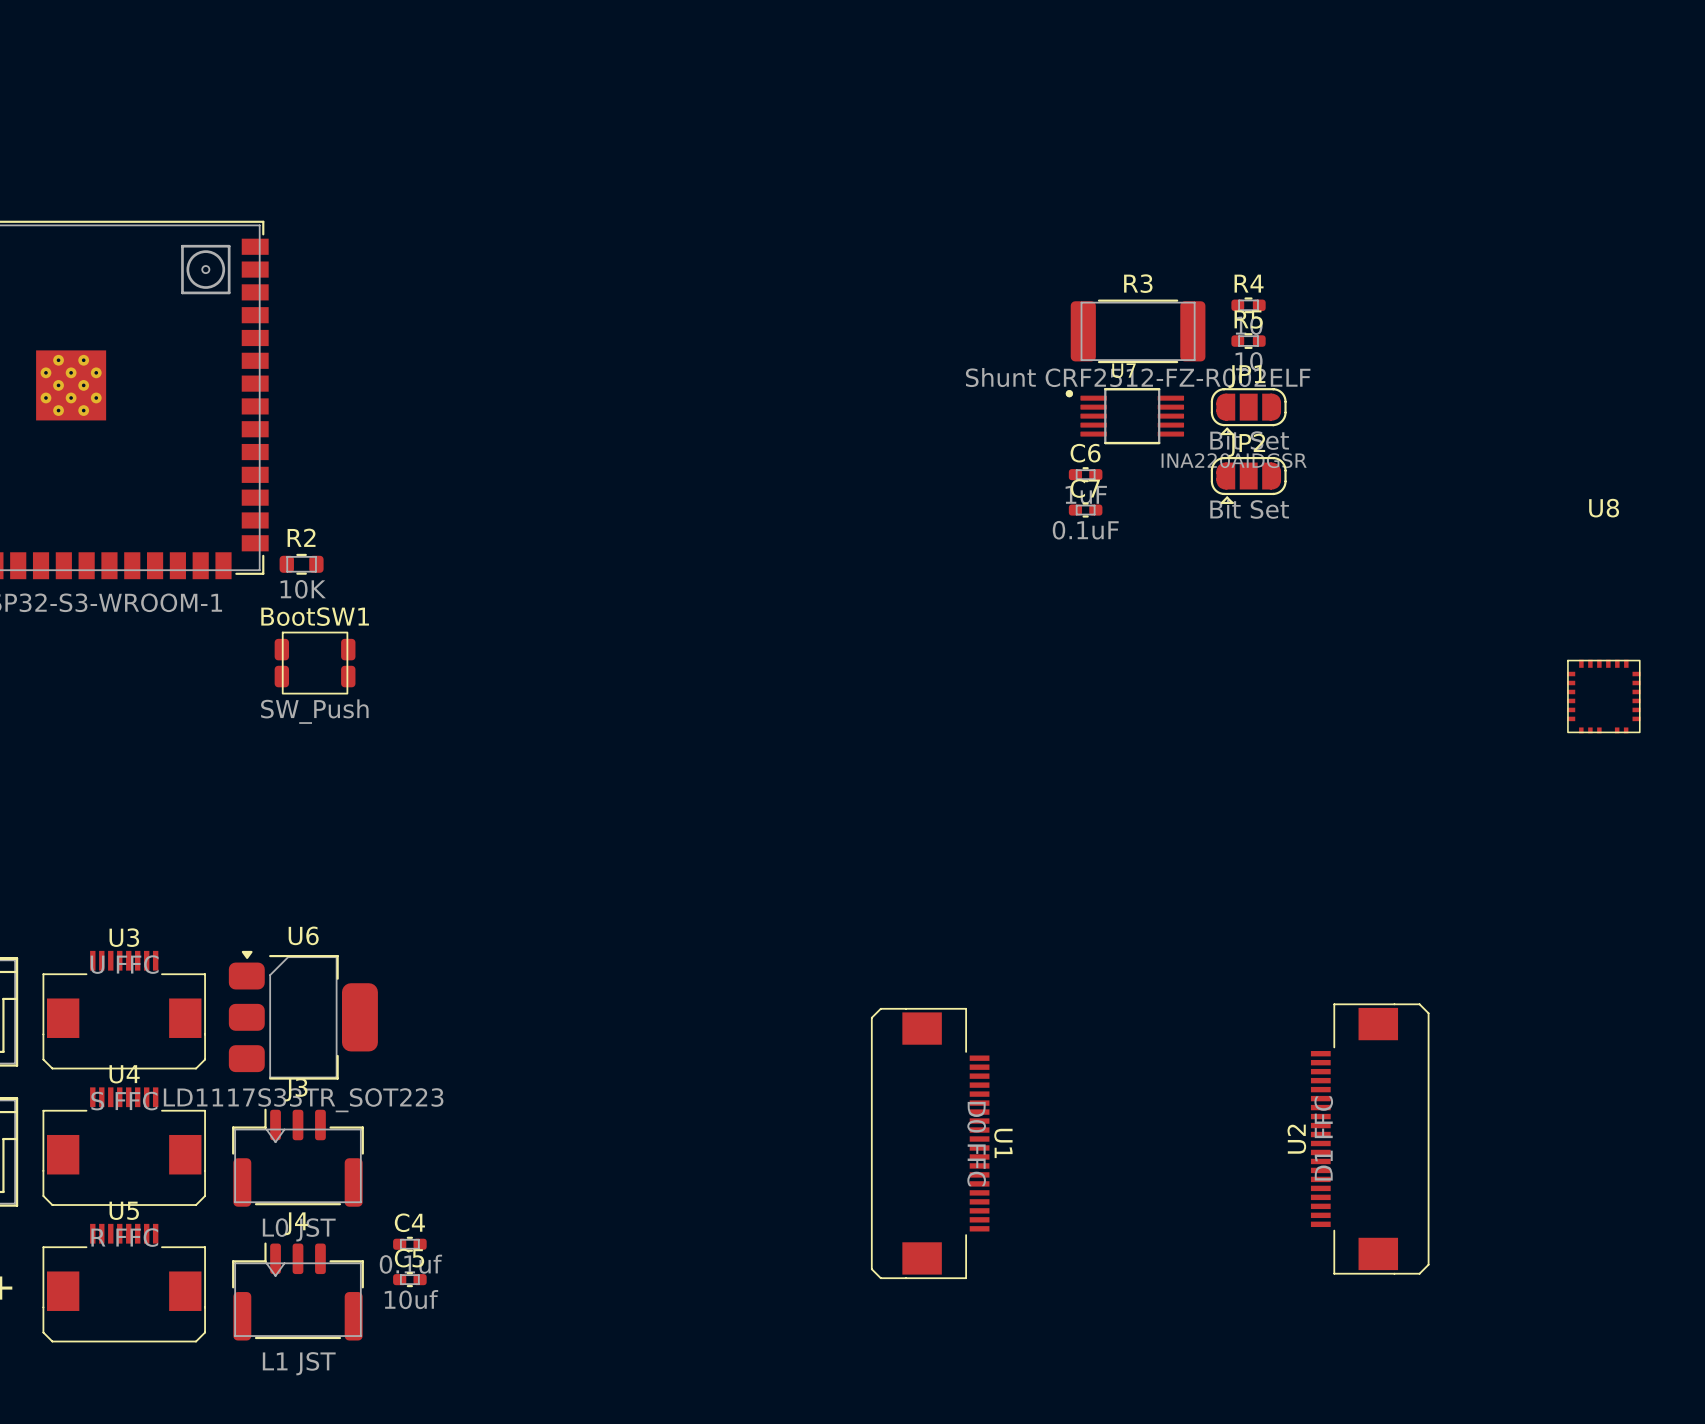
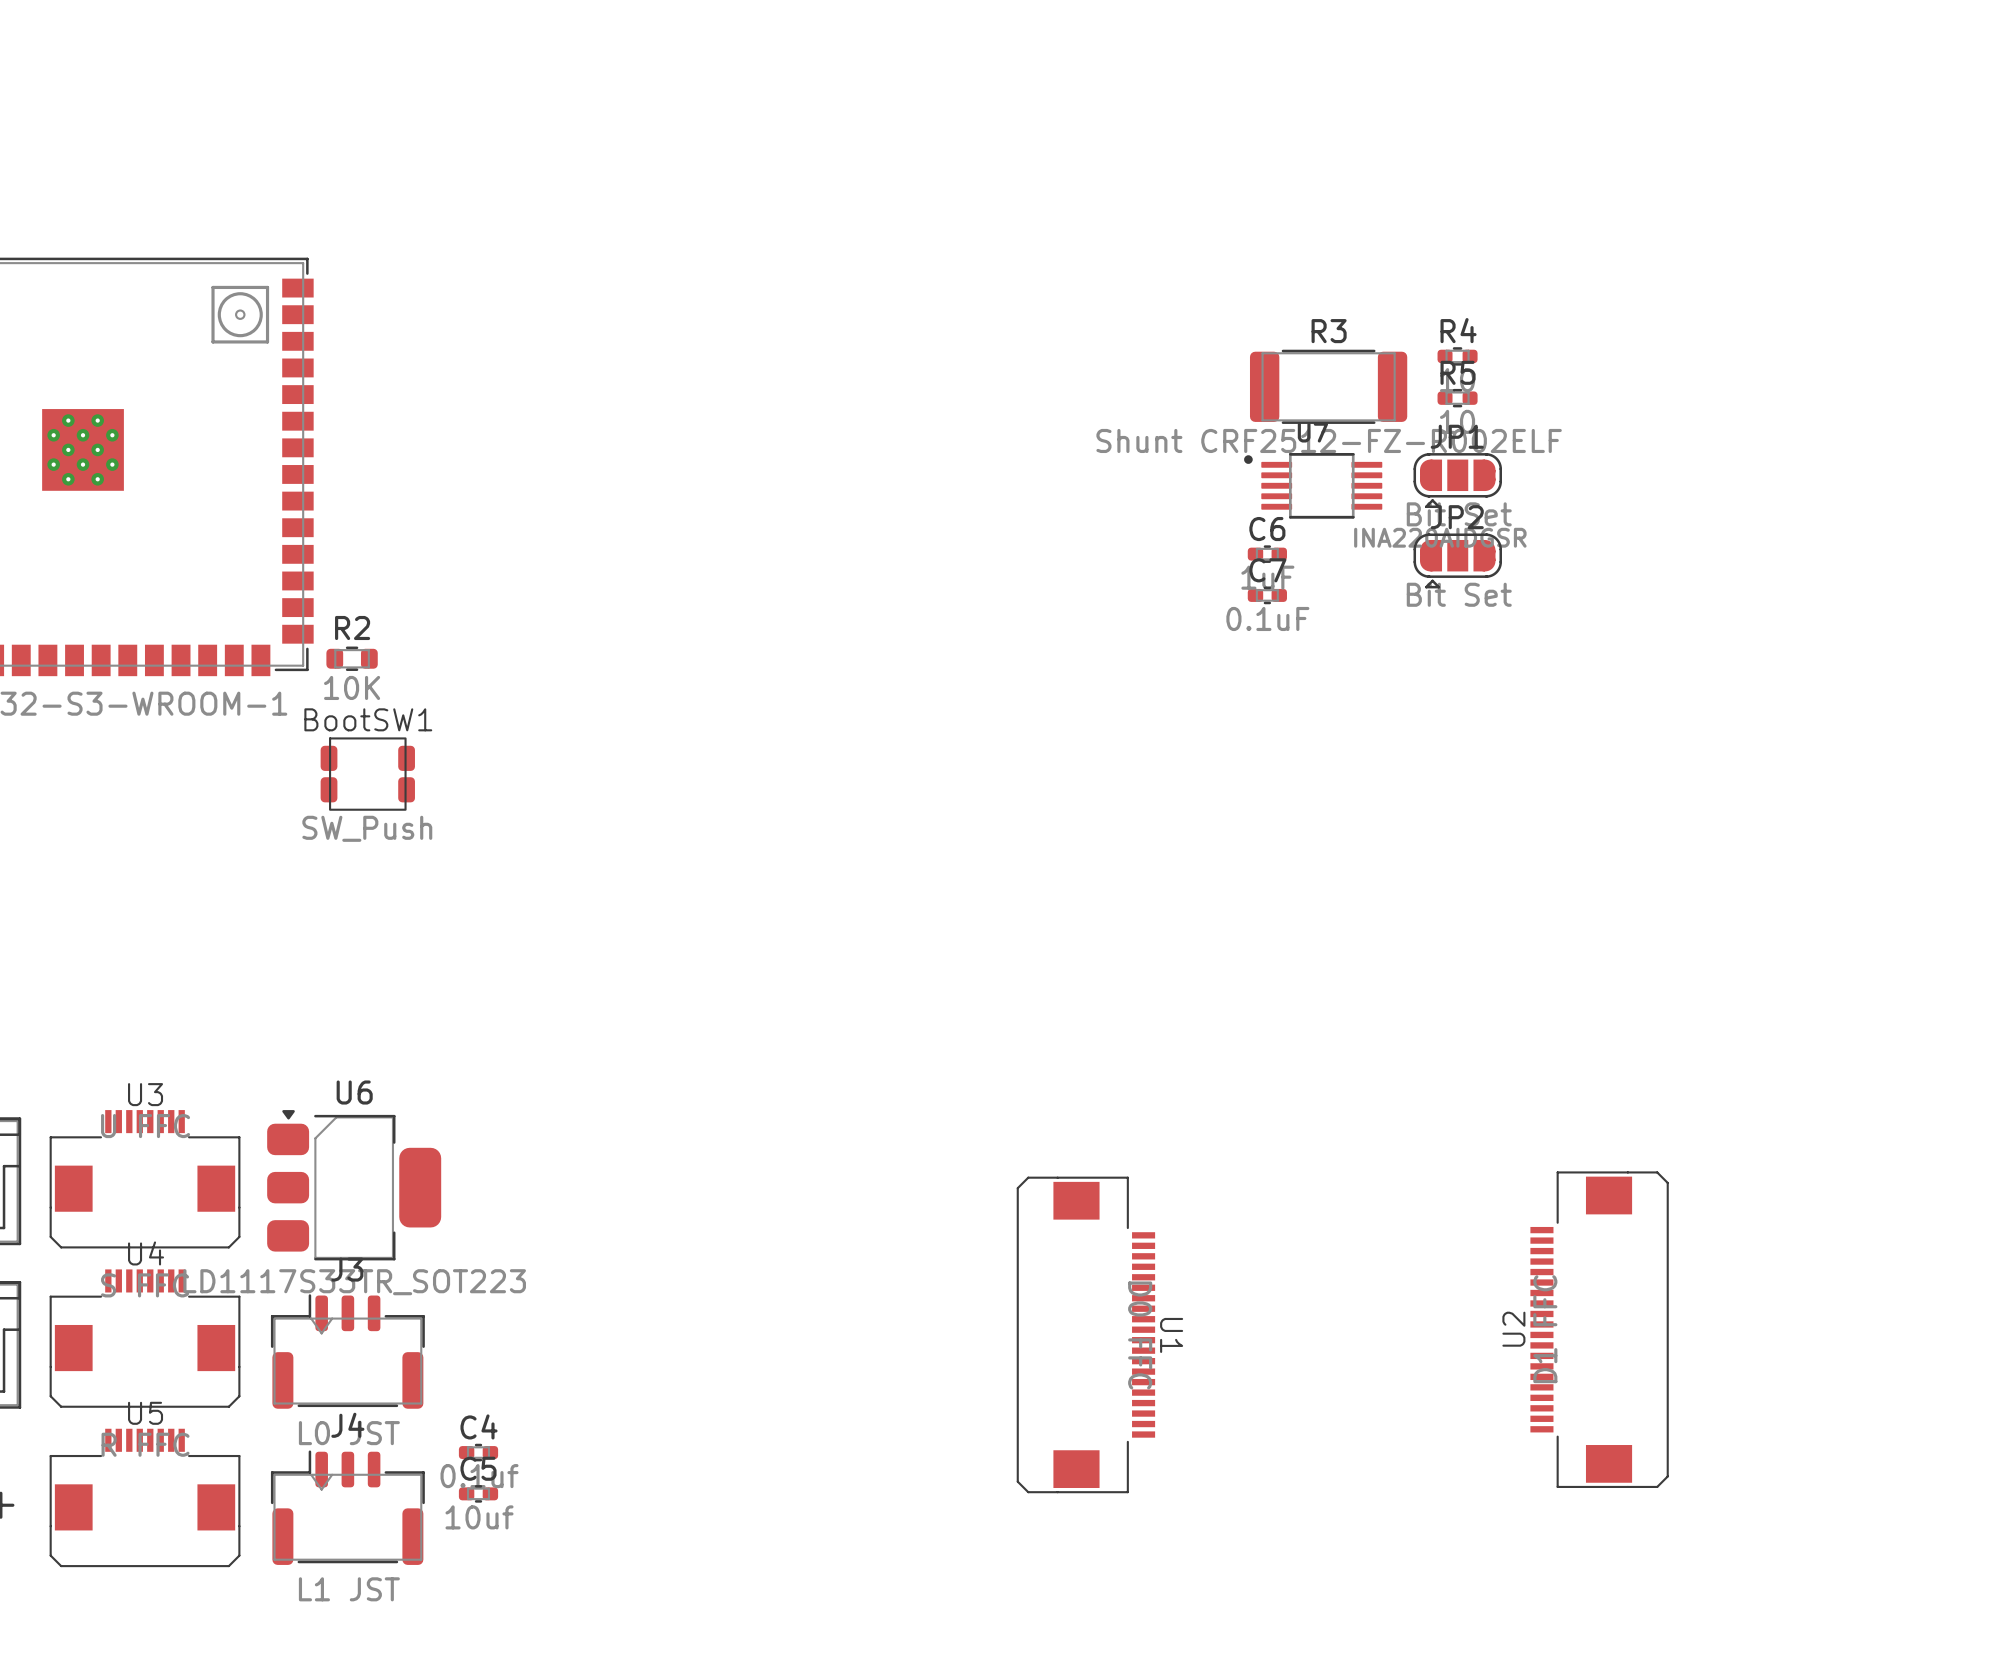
U8: (1603, 696) -> none

